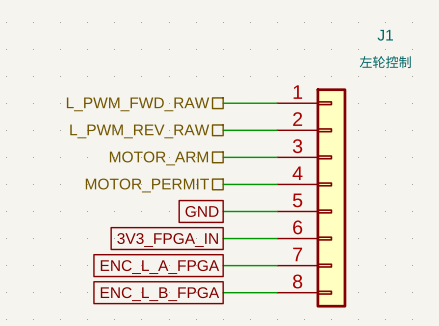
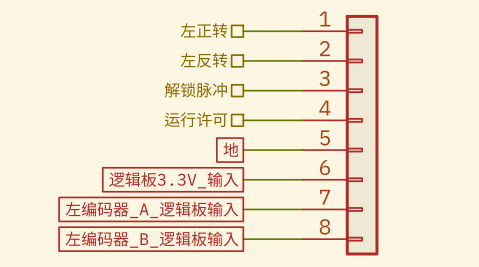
hierarchical label: L_PWM_FWD_RAW (138, 104) -> 左正转 (204, 30)
hierarchical label: L_PWM_REV_RAW (139, 131) -> 左反转 (204, 60)
hierarchical label: MOTOR_ARM (158, 158) -> 解锁脉冲 (195, 89)
hierarchical label: MOTOR_PERMIT (147, 185) -> 运行许可 (196, 119)
global label: GND (201, 211) -> 地 (230, 149)
global label: 3V3_FPGA_IN (167, 240) -> 逻辑板3.3V_输入 (173, 180)
global label: ENC_L_A_FPGA (159, 267) -> 左编码器_A_逻辑板输入 (152, 209)
global label: ENC_L_B_FPGA (159, 294) -> 左编码器_B_逻辑板输入 (152, 239)

